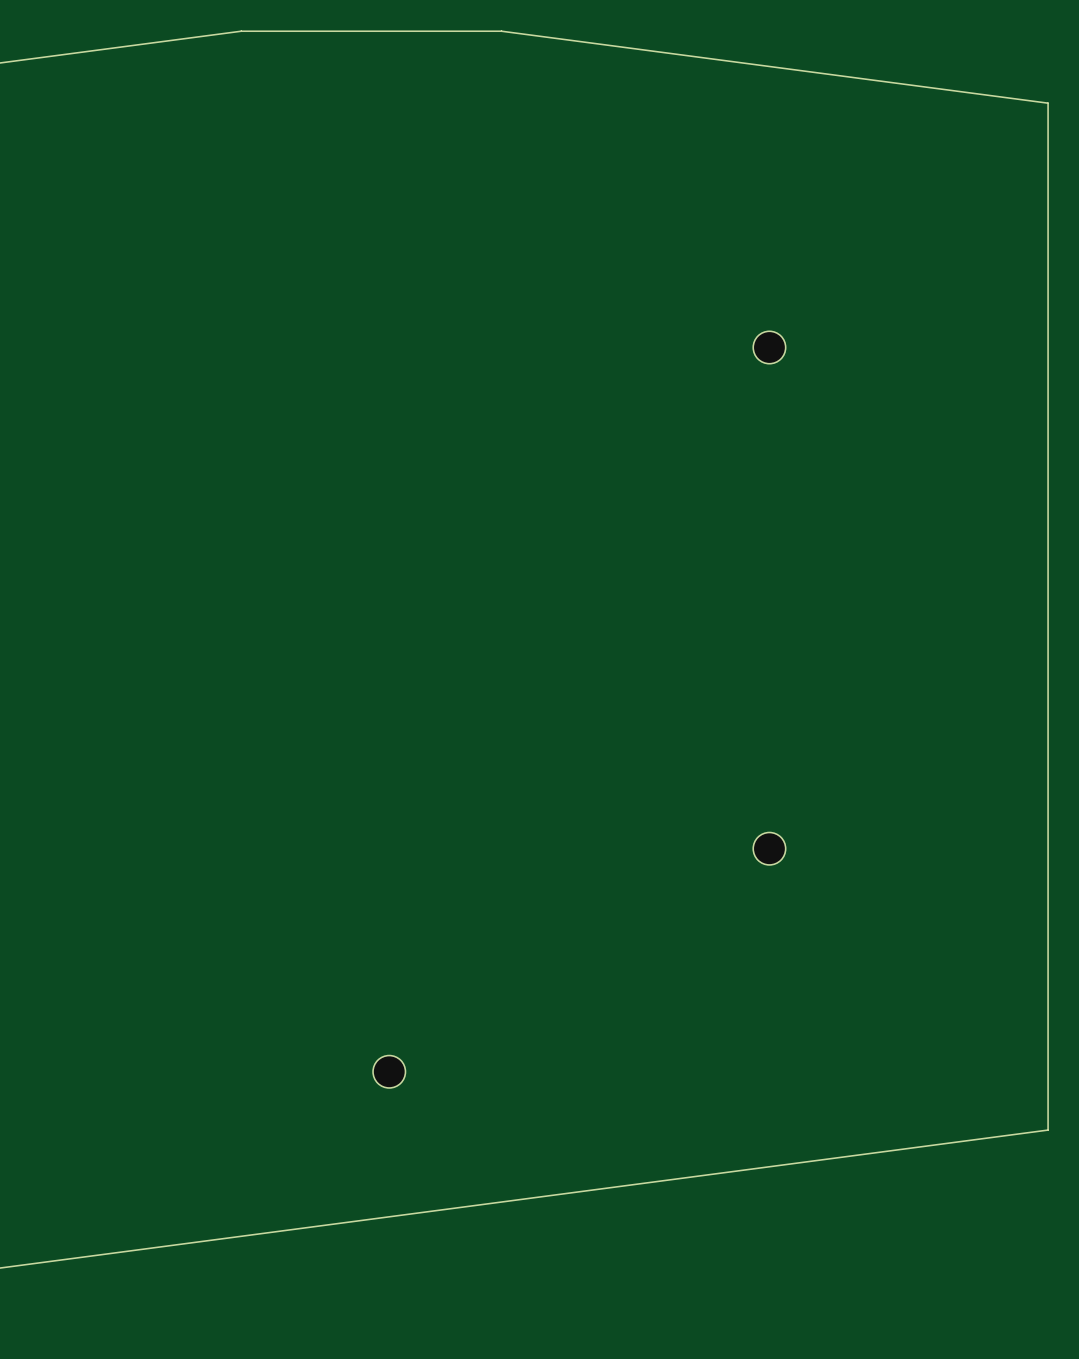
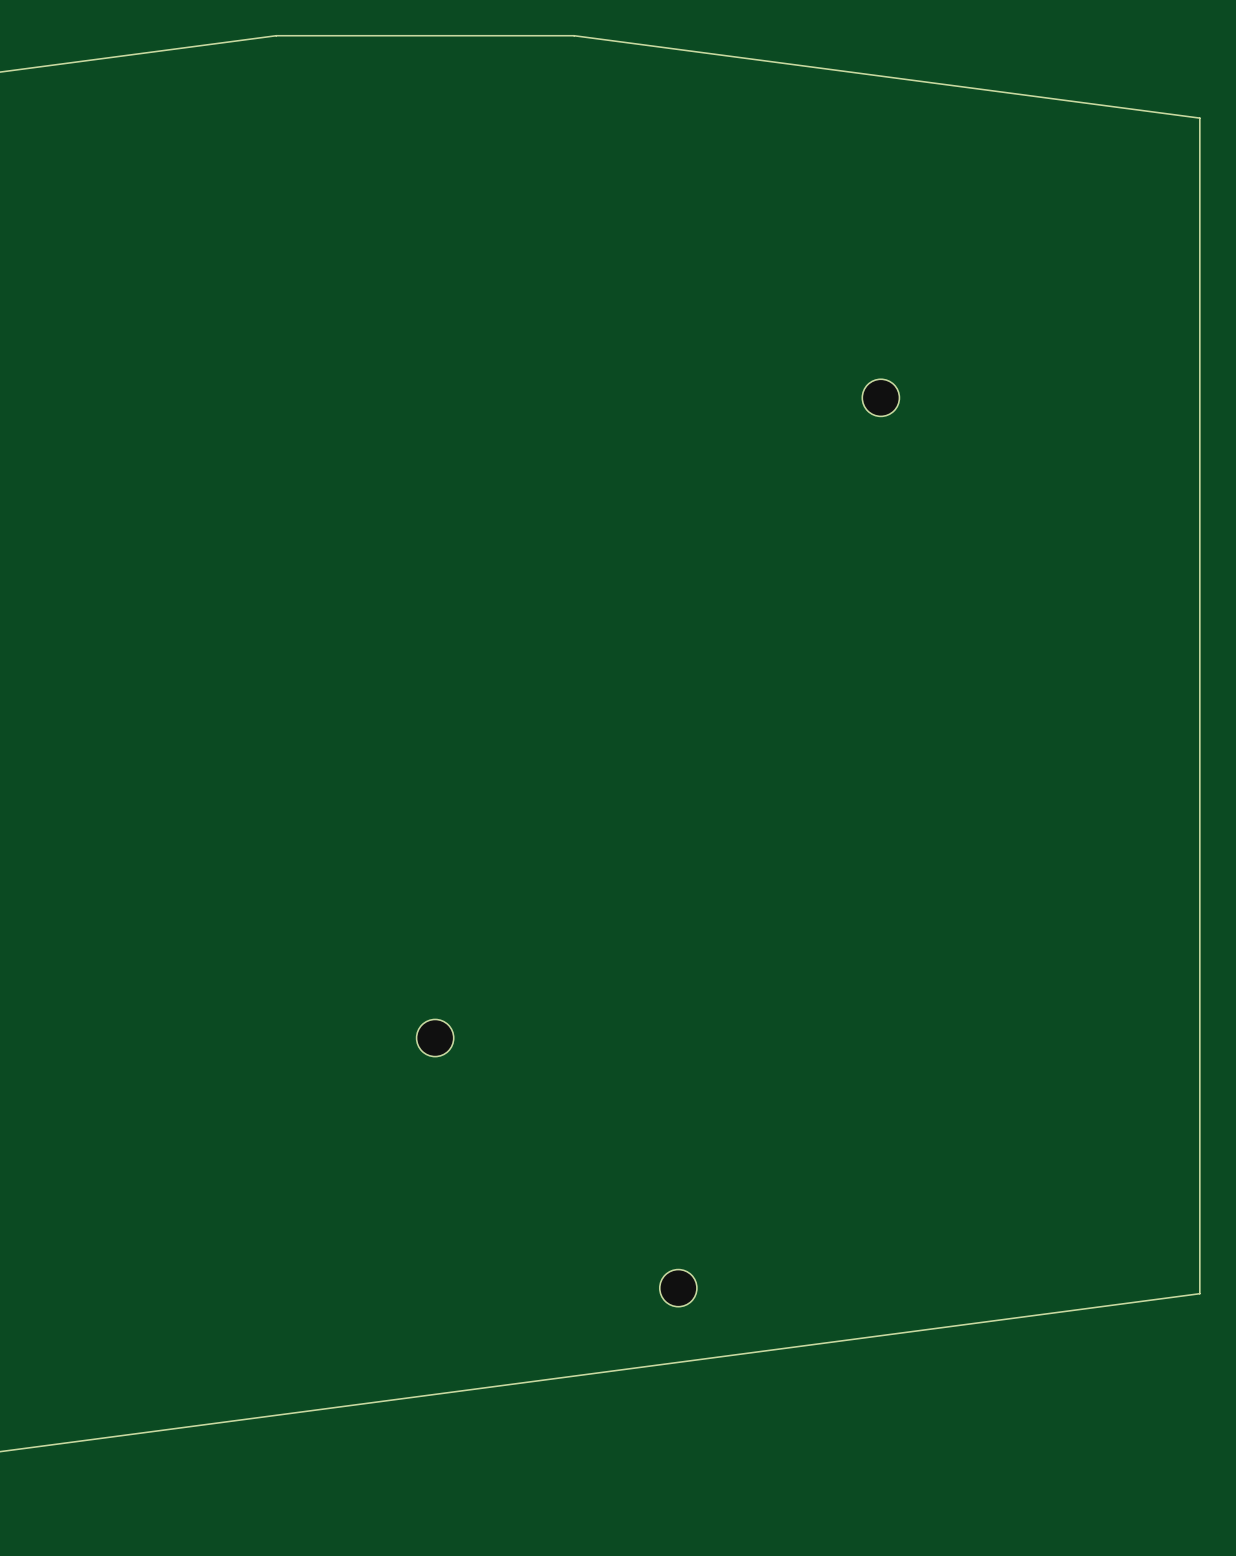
part: (769, 848) -> none
part: none -> (435, 1038)
part: (389, 1071) -> none
part: none -> (678, 1288)

